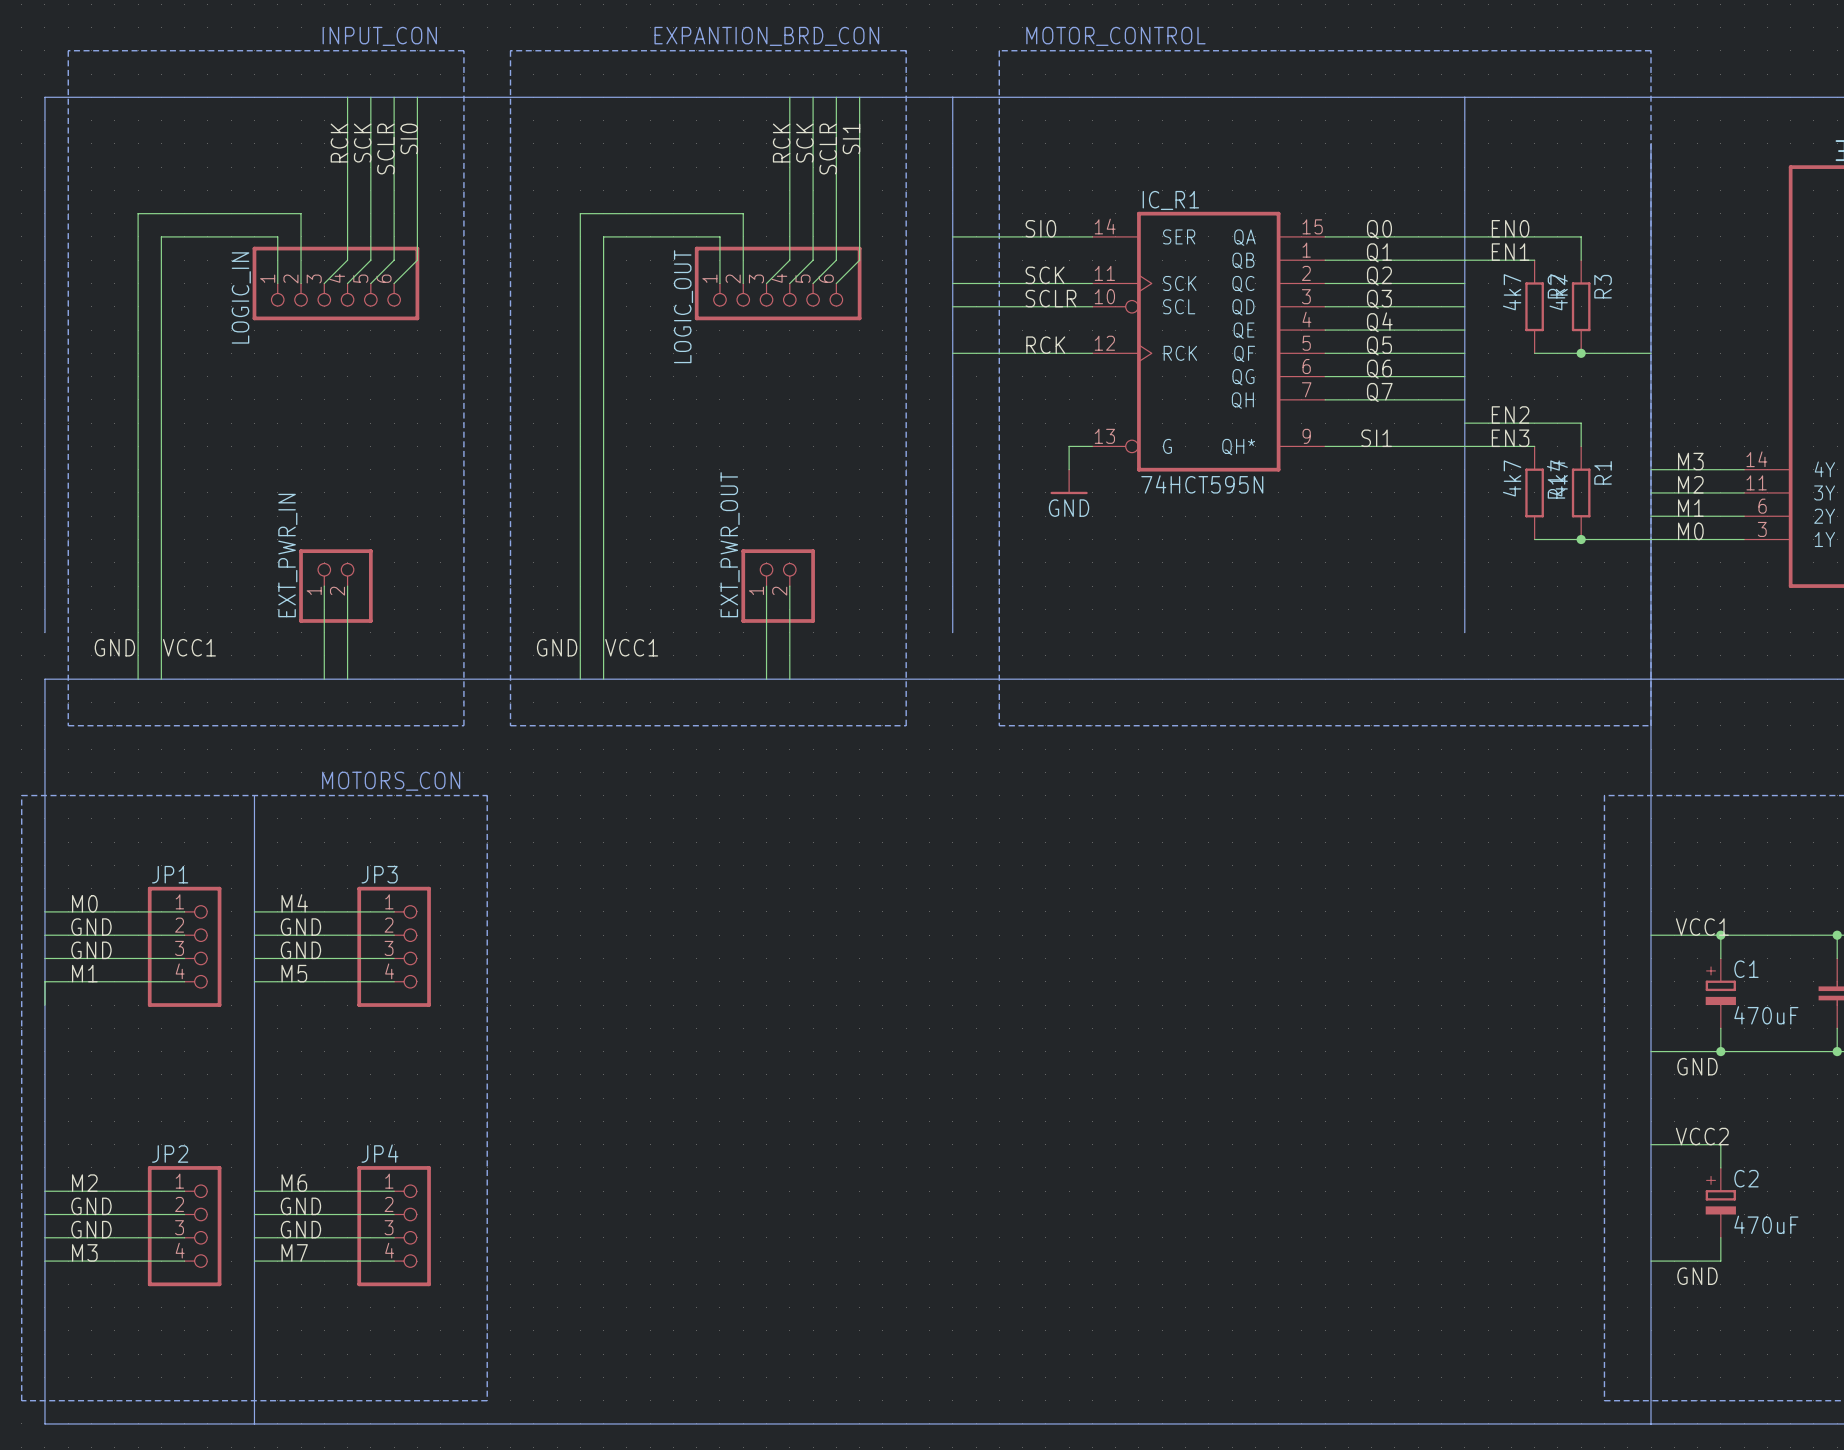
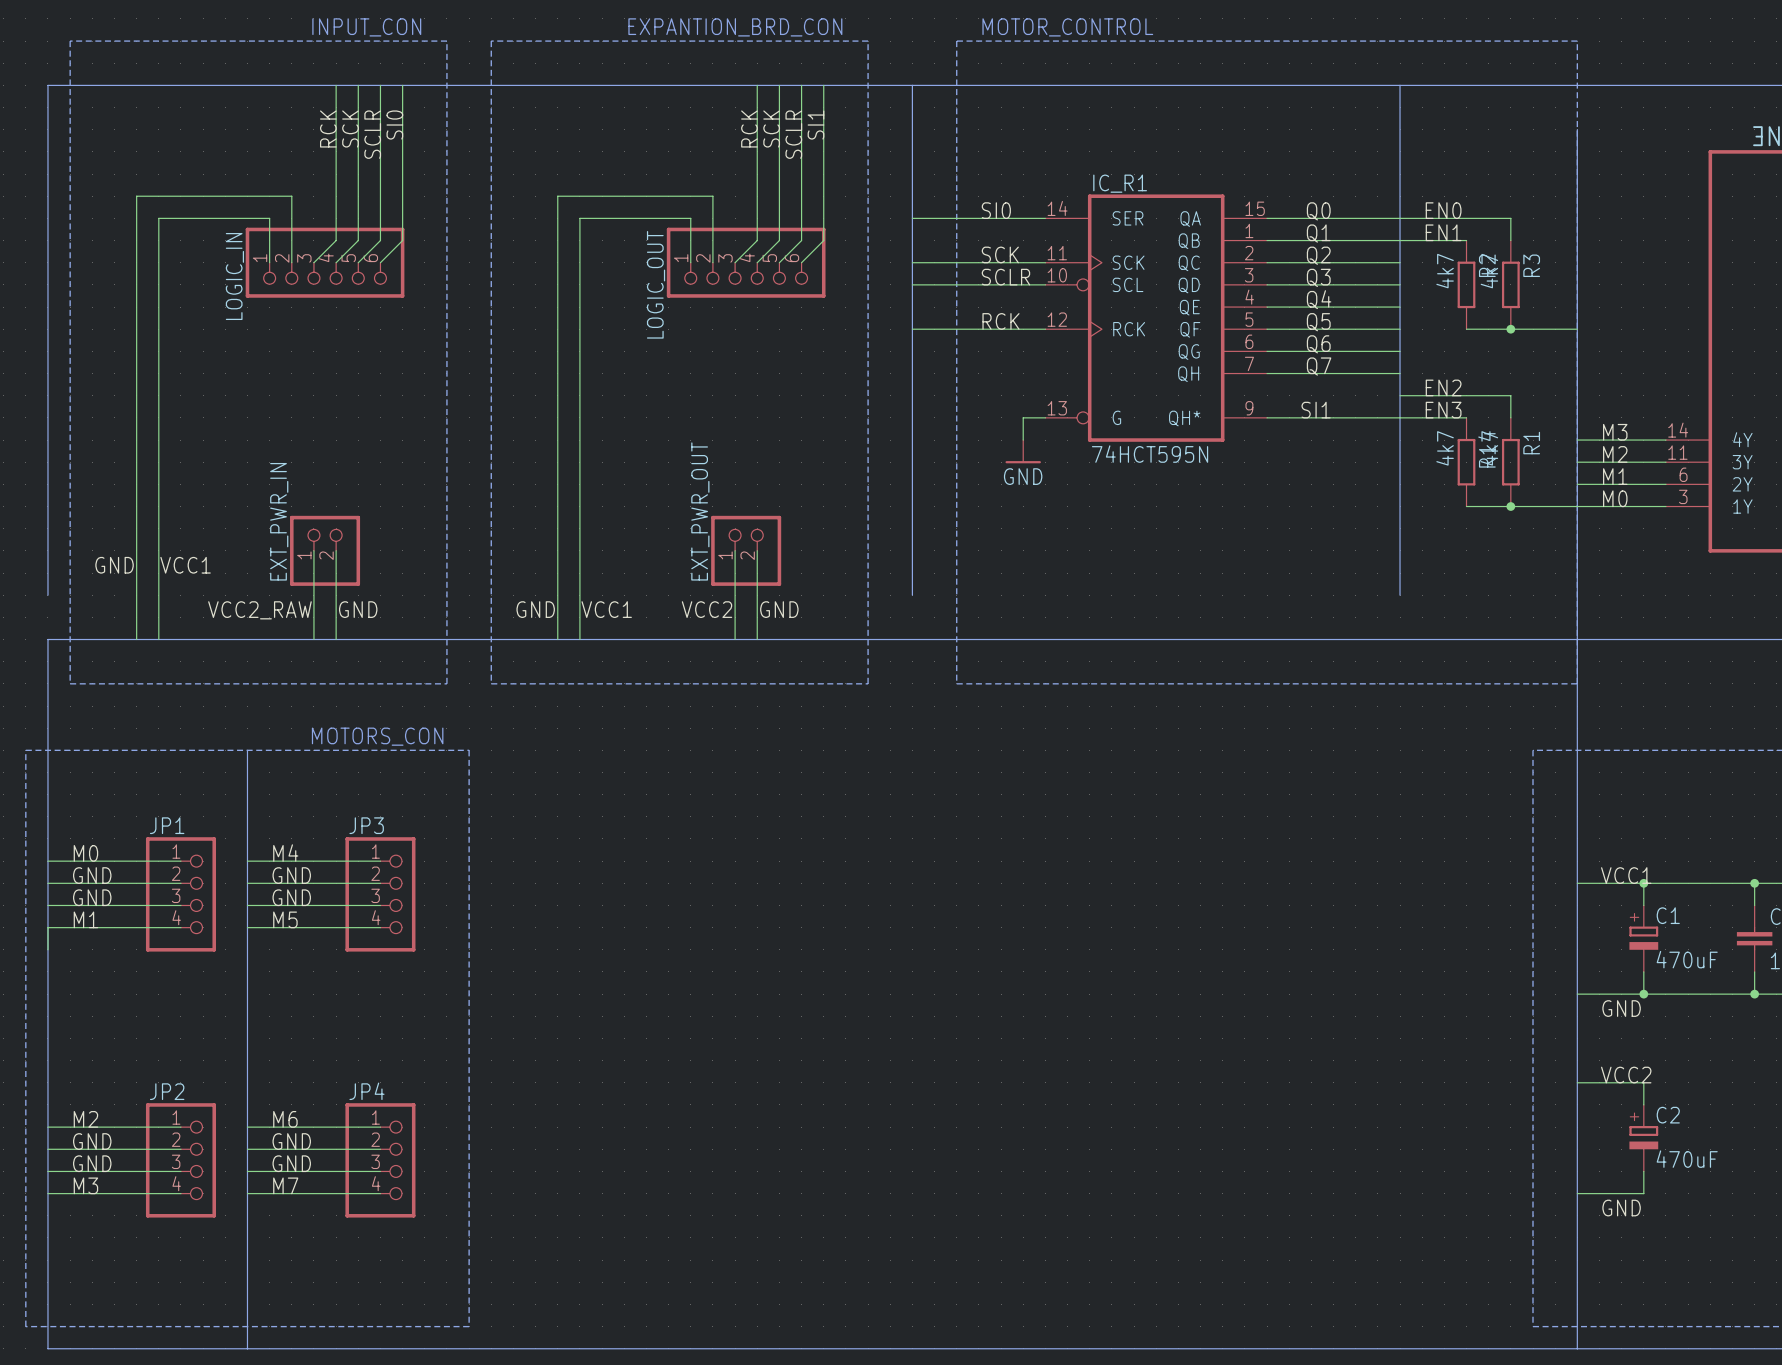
label position: GND (114, 647) -> GND (114, 565)
label position: VCC1 (189, 647) -> VCC1 (185, 565)
label: none -> GND (358, 609)
label: none -> VCC2 (707, 609)
label: none -> GND (779, 609)
label: none -> VCC2_RAW (259, 610)

